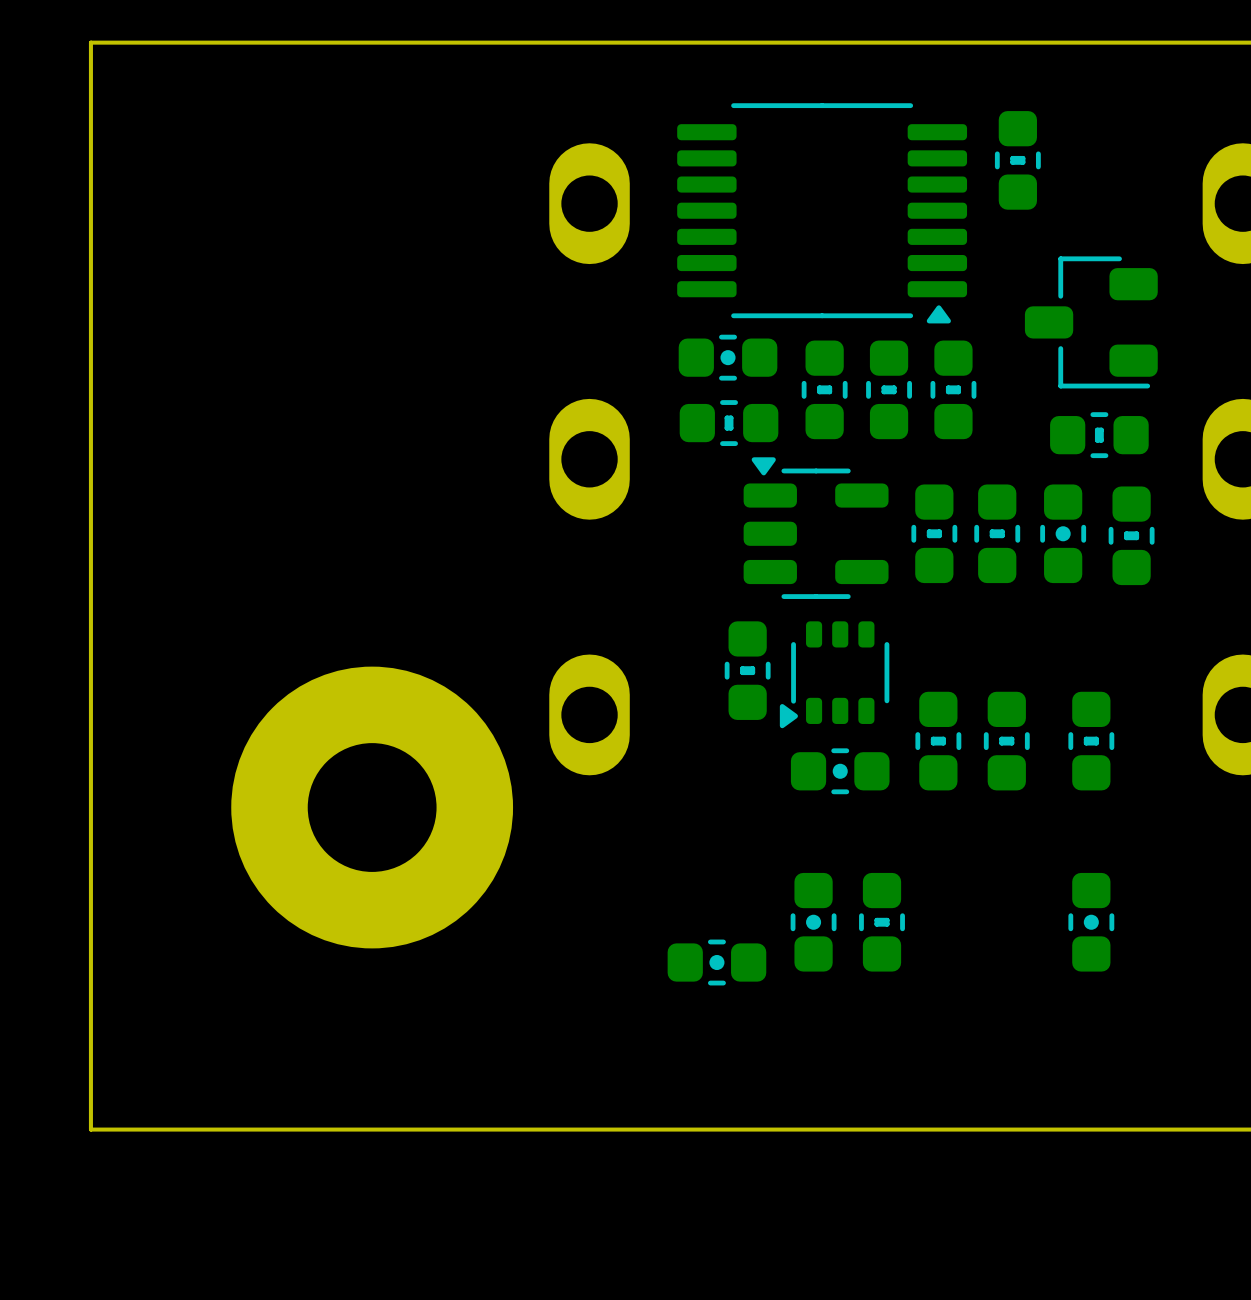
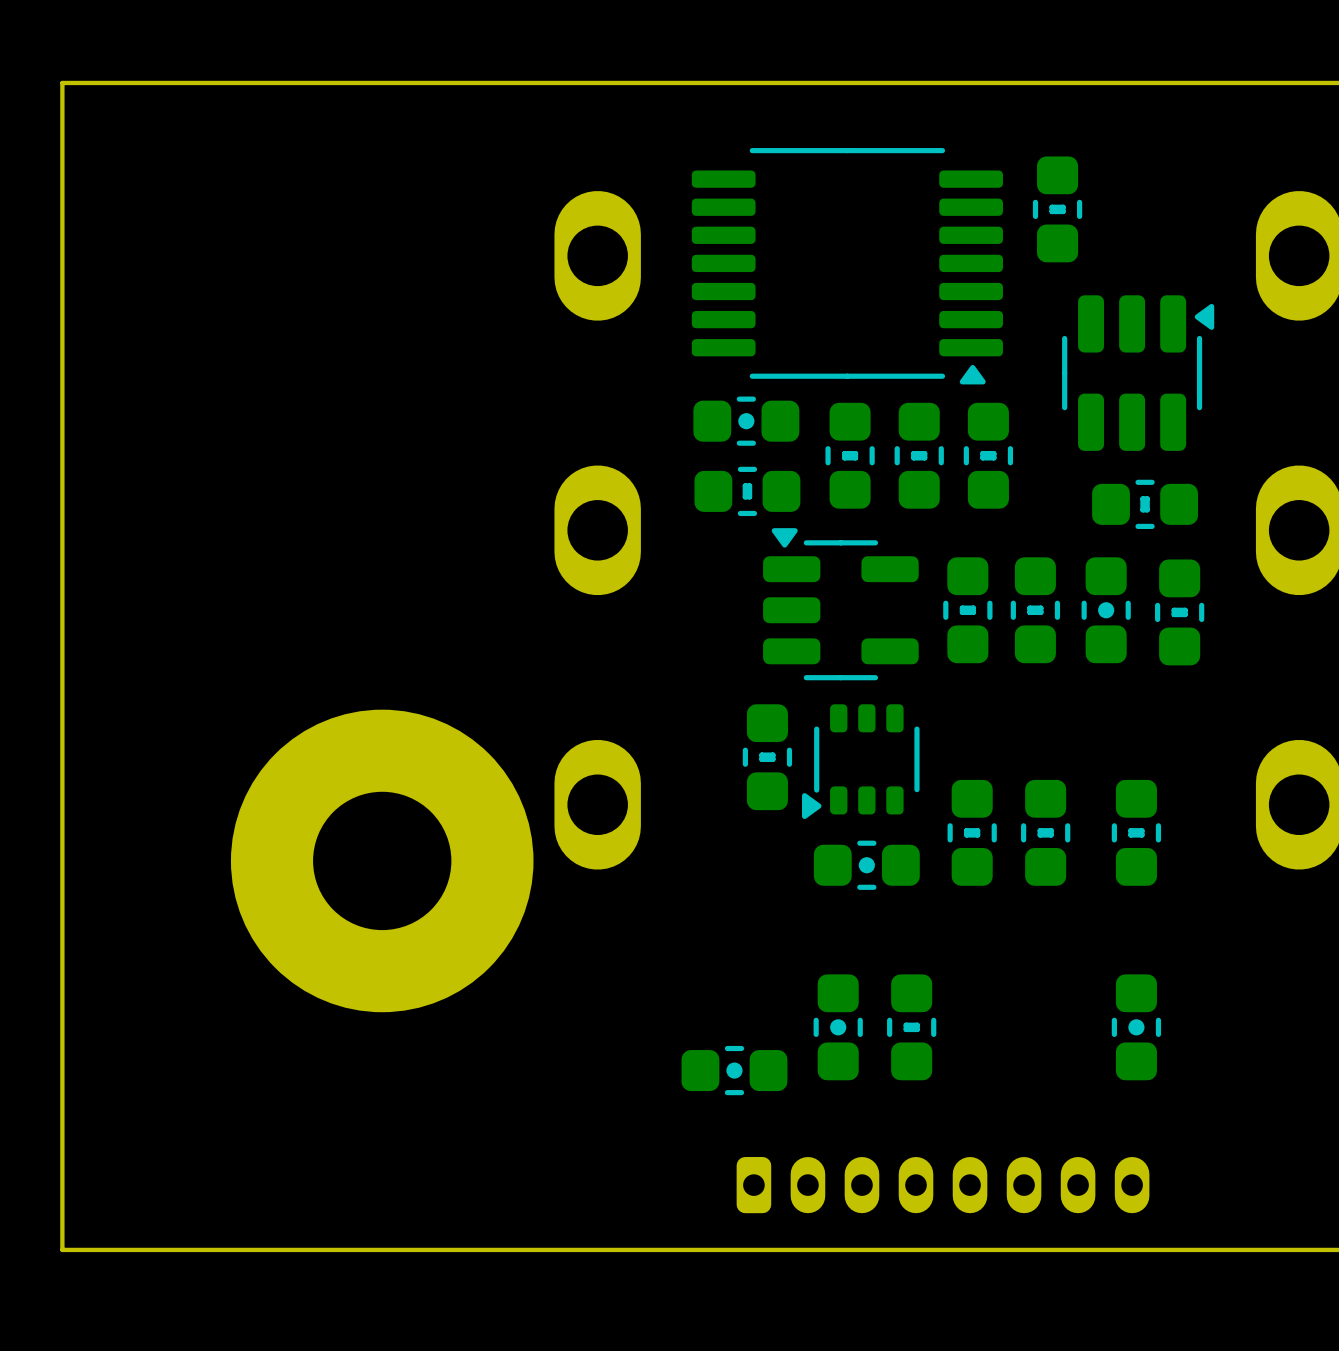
part footprint: [1024, 256, 1158, 389] -> [1062, 295, 1215, 451]
part position: (372, 807) -> (382, 860)
part: none -> (943, 1185)

